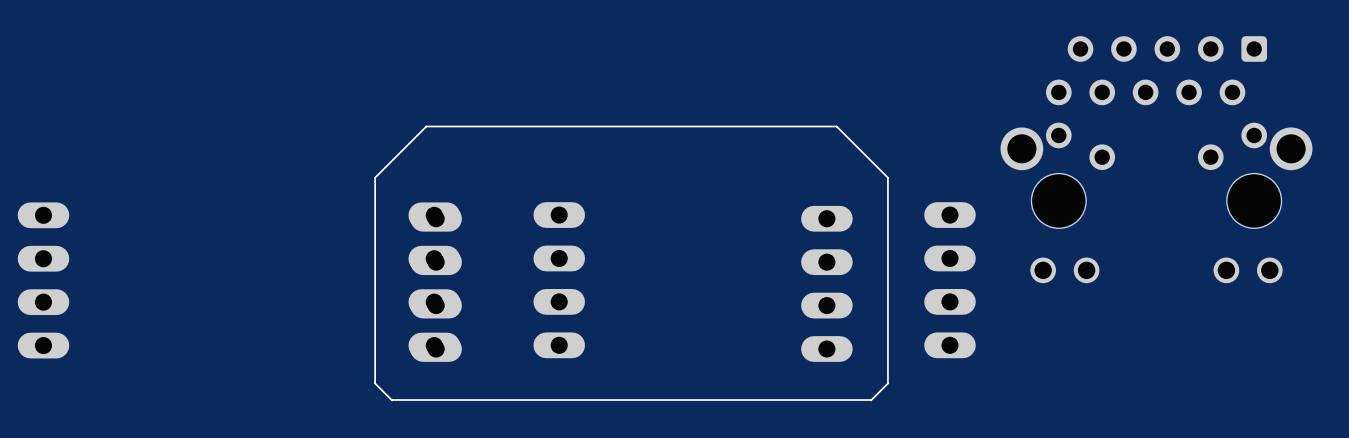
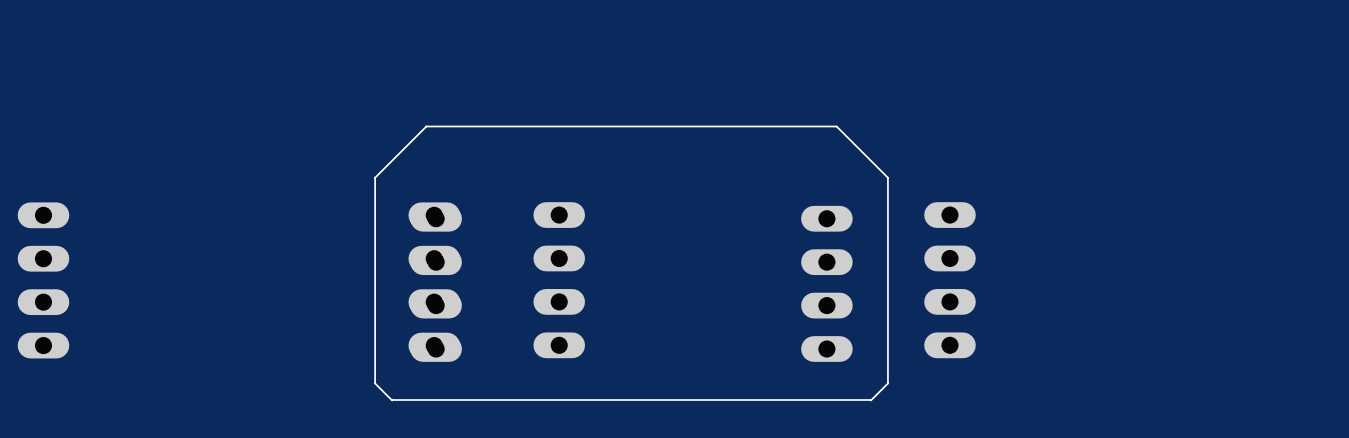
part: (1156, 159) -> none

